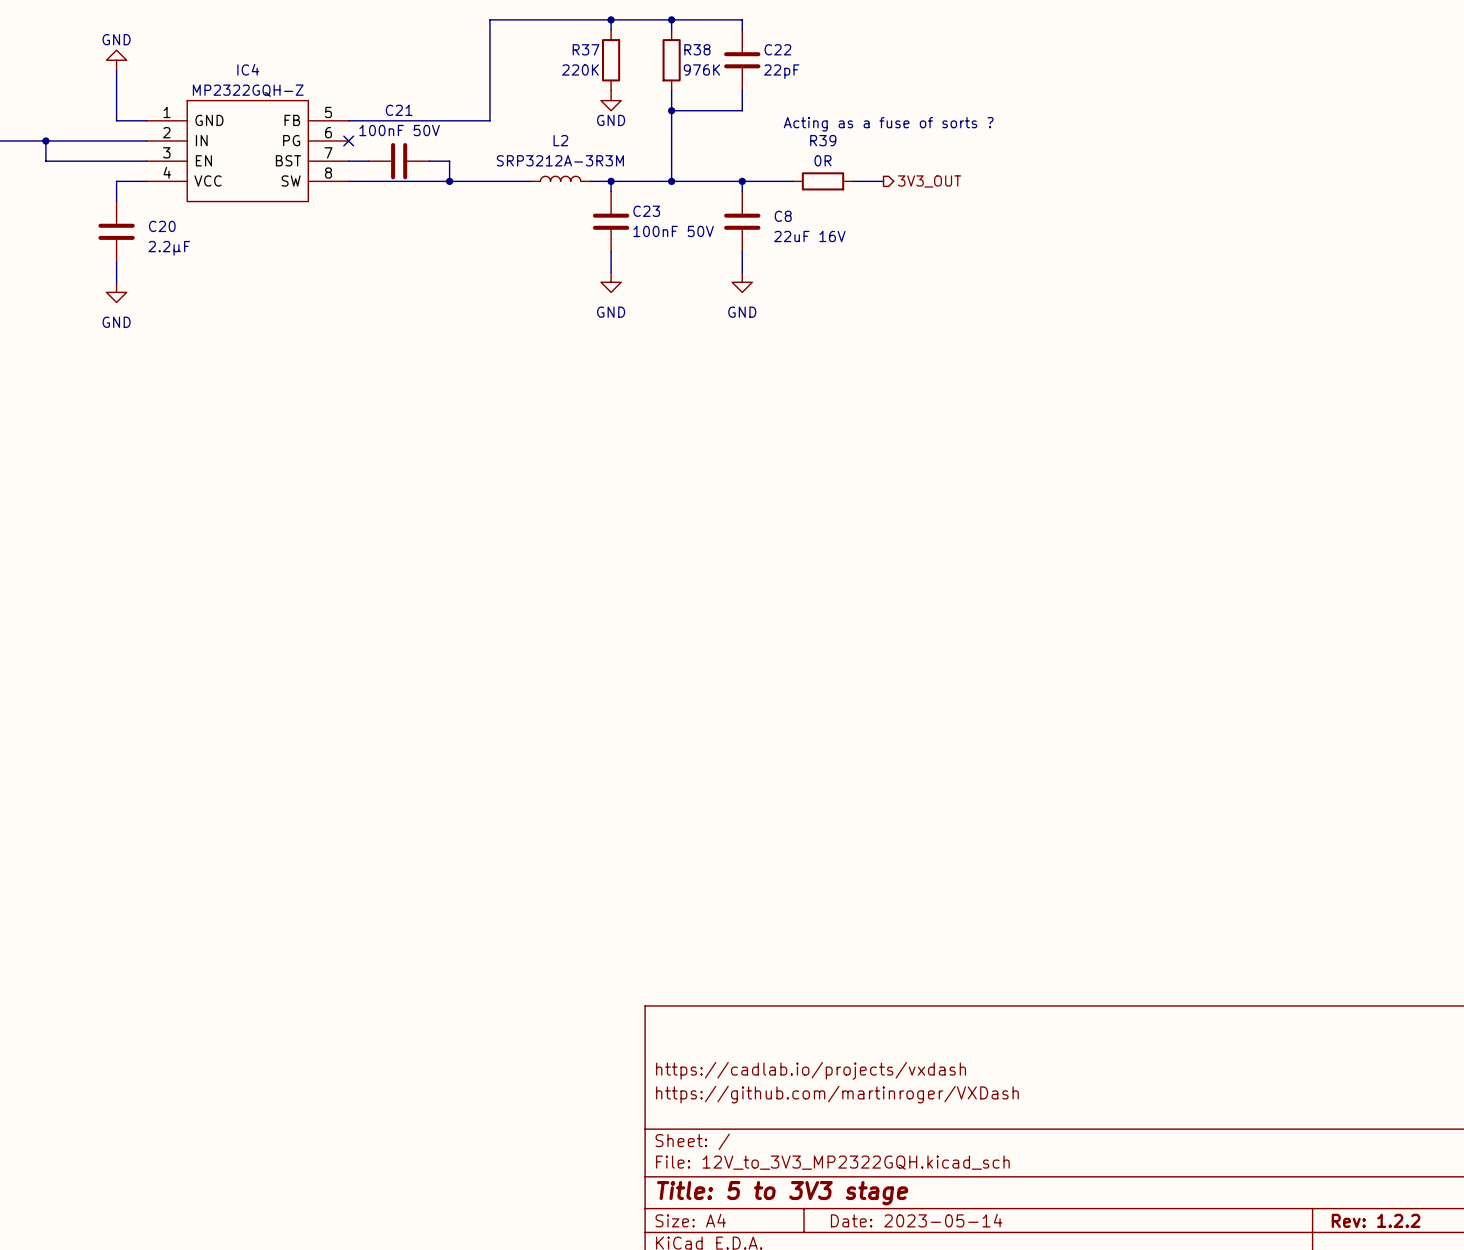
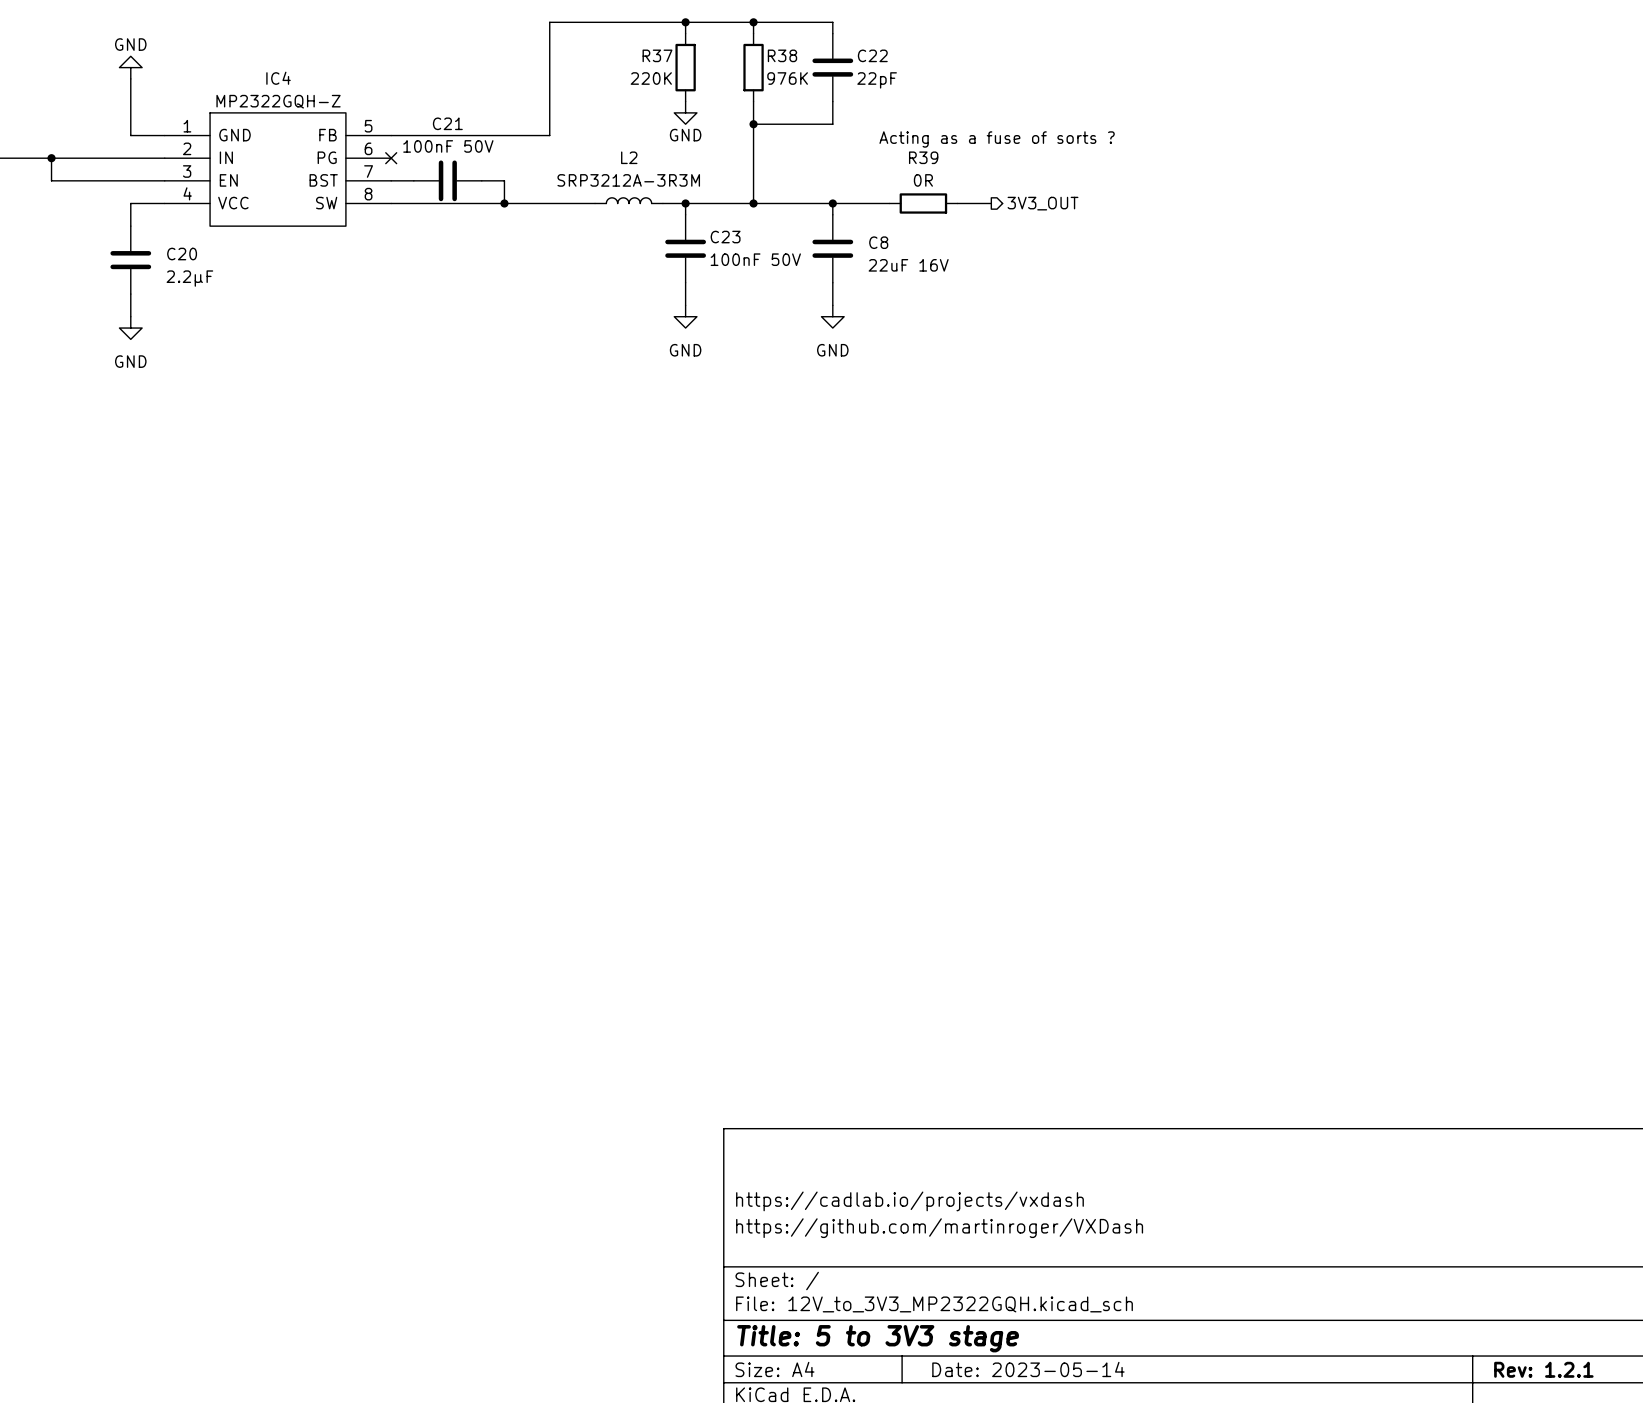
title block: Rev: 1.2.2 (1376, 1220) -> Rev: 1.2.1 (1543, 1369)

